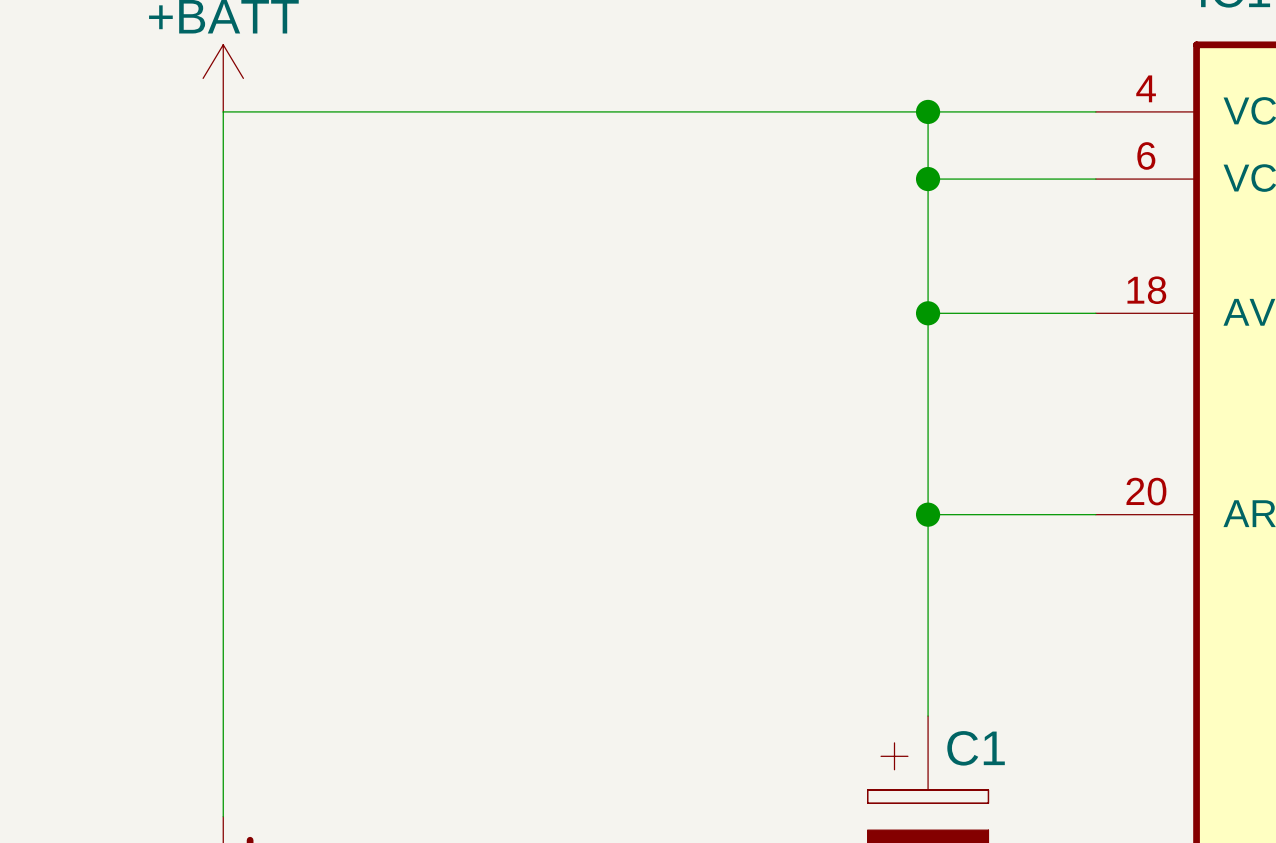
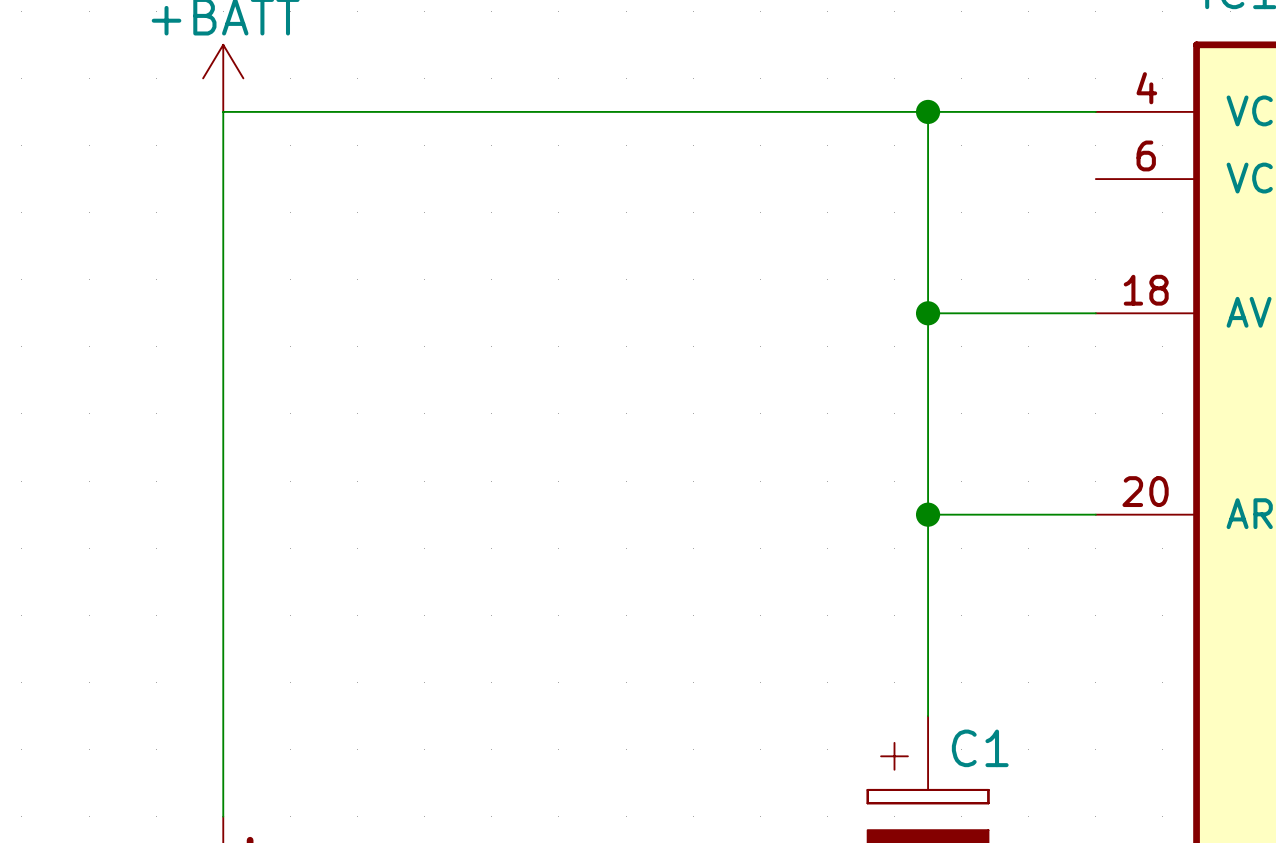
wire: (928, 179) (1095, 179) -> none
junction: (928, 179) -> none

